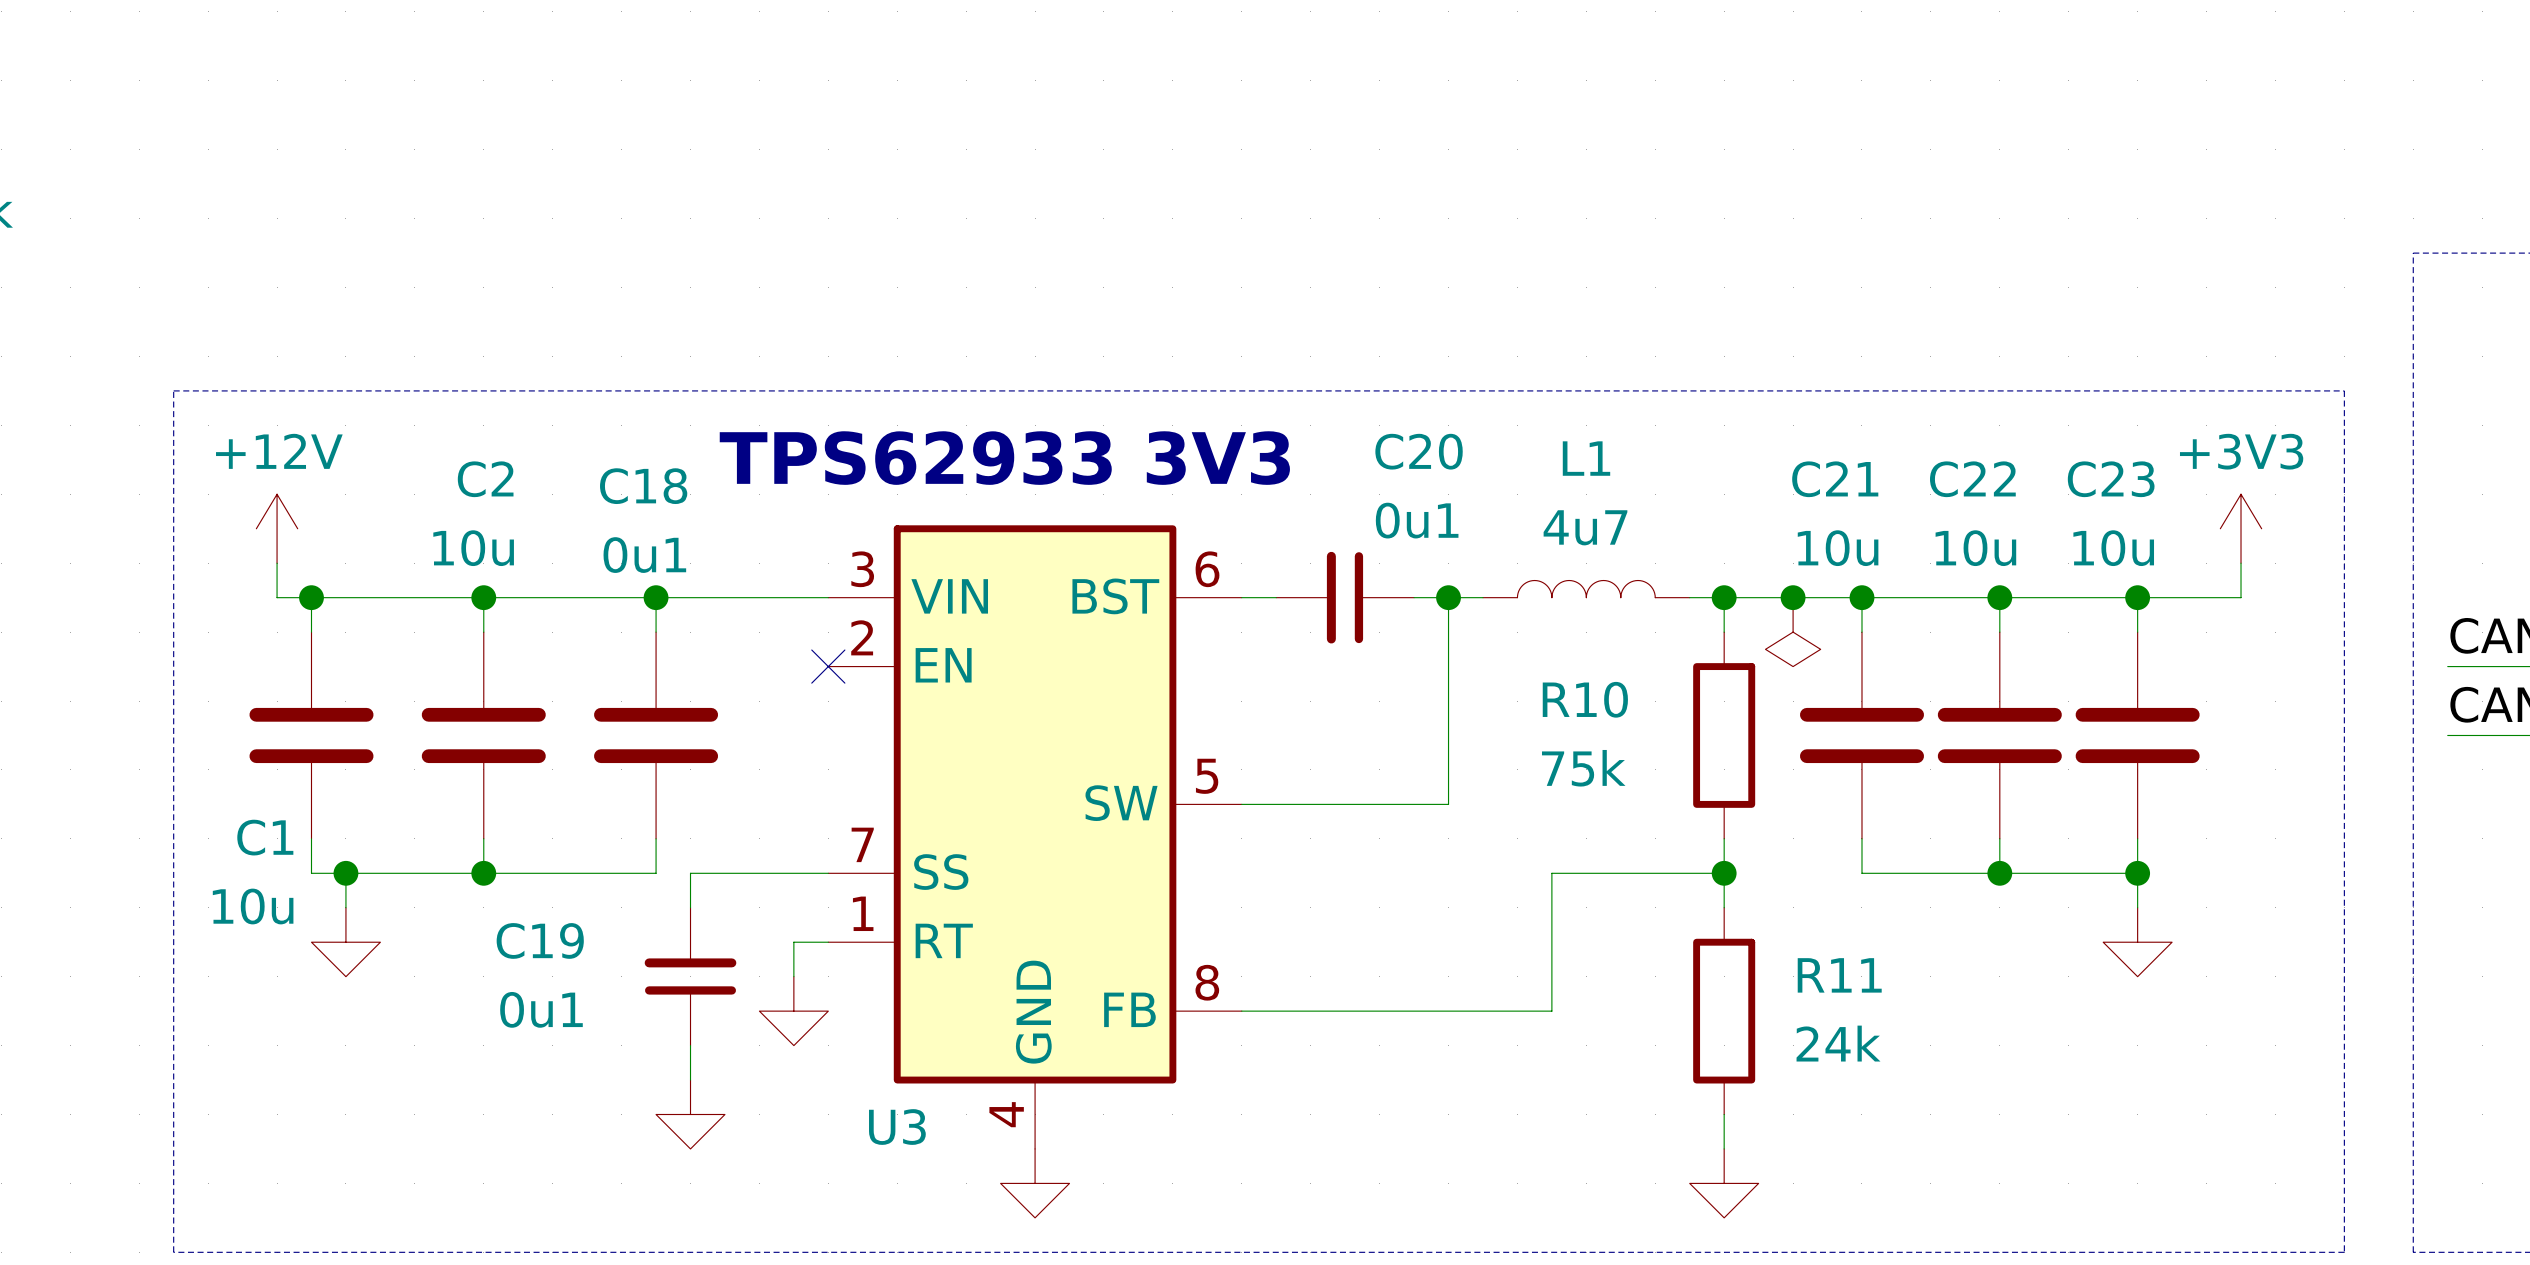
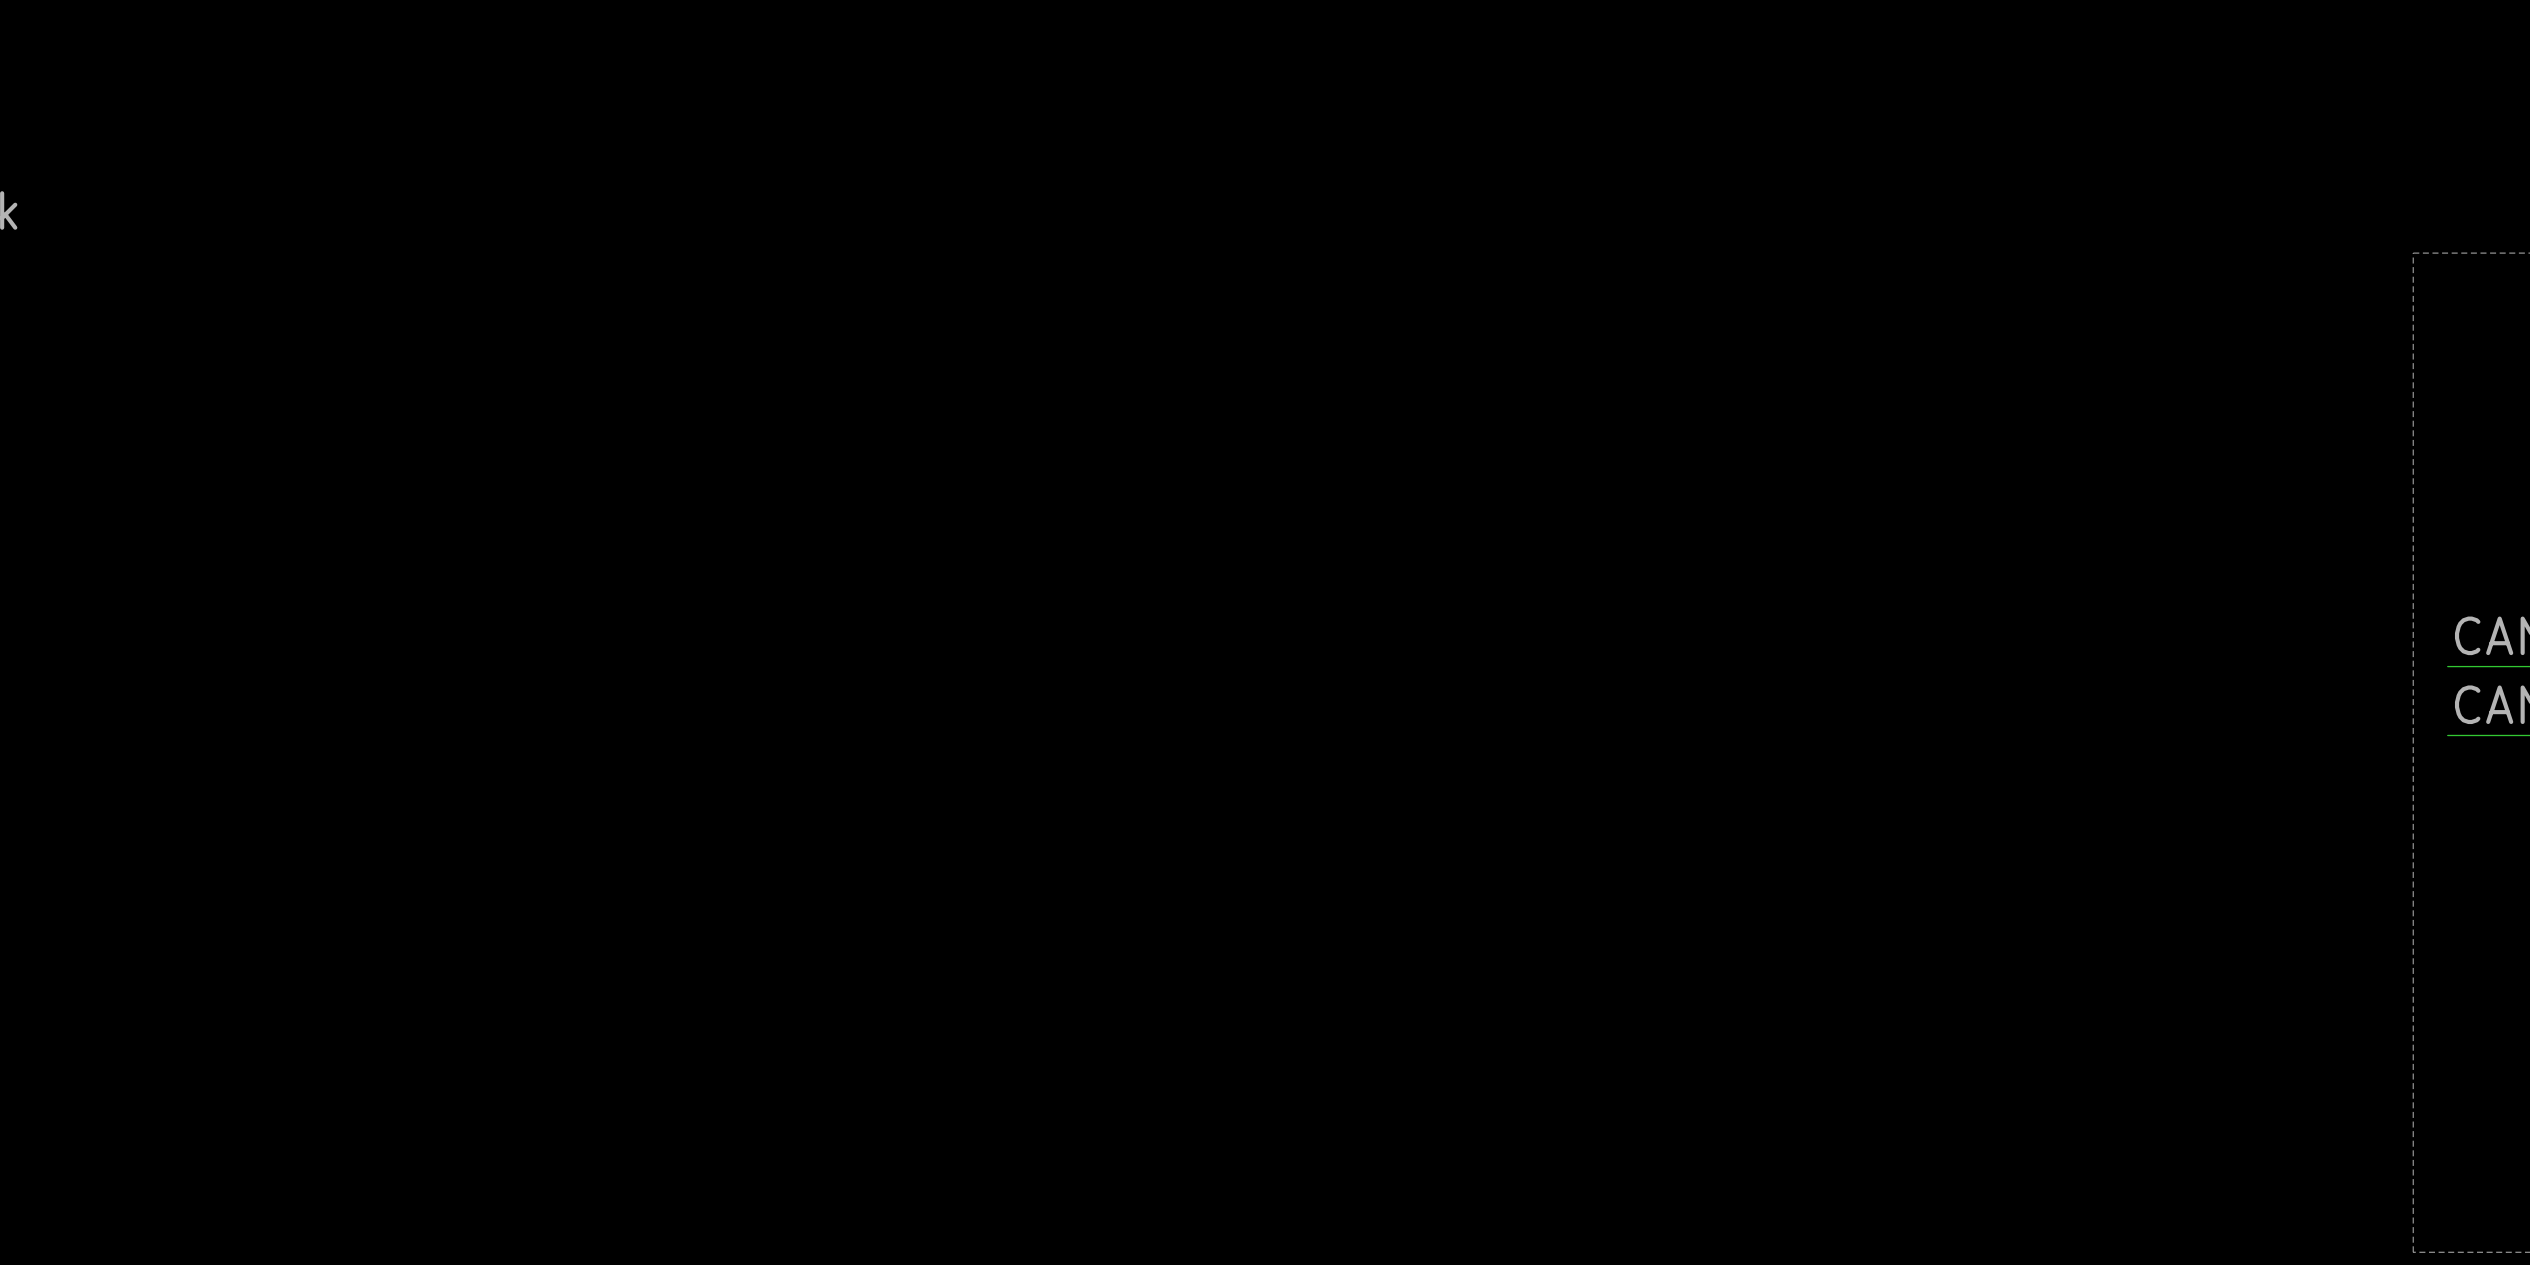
line: (173, 390) (2344, 390) (2344, 1252) (173, 1252) (173, 390) -> none
text: TPS62933 3V3 (1004, 458) -> none
power symbol: +12V (277, 528) -> none
power symbol: +3V3 (2241, 528) -> none
wire: (277, 563) (277, 597) (828, 597) -> none
wire: (2241, 563) (2241, 597) (1689, 597) -> none
L1: 4u7 (1586, 589) -> none
wire: (311, 597) (311, 632) -> none
junction: (311, 597) -> none
wire: (483, 597) (483, 632) -> none
junction: (483, 597) -> none
wire: (656, 597) (656, 632) -> none
junction: (656, 597) -> none
wire: (1241, 597) (1276, 597) -> none
C20: 0u1 (1345, 597) -> none
wire: (1414, 597) (1482, 597) -> none
wire: (1448, 597) (1448, 804) (1241, 804) -> none
junction: (1448, 597) -> none
wire: (1724, 597) (1724, 632) -> none
junction: (1724, 597) -> none
junction: (1793, 597) -> none
wire: (1861, 597) (1861, 632) -> none
junction: (1861, 597) -> none
wire: (1999, 597) (1999, 632) -> none
junction: (1999, 597) -> none
wire: (2137, 597) (2137, 632) -> none
junction: (2137, 597) -> none
power symbol: (1793, 632) -> none
no-connect mark: (828, 666) -> none
C1: 10u (311, 735) -> none
C2: 10u (483, 735) -> none
C18: 0u1 (656, 735) -> none
R10: 75k (1724, 735) -> none
C21: 10u (1861, 735) -> none
C22: 10u (1999, 735) -> none
C23: 10u (2137, 735) -> none
U3: (1035, 837) -> none
wire: (311, 838) (311, 873) (656, 873) (656, 838) -> none
wire: (483, 838) (483, 873) -> none
wire: (1724, 838) (1724, 907) -> none
wire: (1861, 838) (1861, 873) (2137, 873) -> none
wire: (1999, 838) (1999, 873) -> none
wire: (2137, 838) (2137, 907) -> none
wire: (345, 873) (345, 907) -> none
junction: (345, 873) -> none
junction: (483, 873) -> none
wire: (828, 873) (690, 873) (690, 907) -> none
wire: (1724, 873) (1551, 873) (1551, 1011) (1241, 1011) -> none
junction: (1724, 873) -> none
junction: (1999, 873) -> none
junction: (2137, 873) -> none
power symbol: (345, 942) -> none
wire: (828, 942) (793, 942) (793, 976) -> none
power symbol: (2137, 942) -> none
C19: 0u1 (690, 976) -> none
power symbol: (793, 1011) -> none
R11: 24k (1724, 1011) -> none
wire: (690, 1045) (690, 1080) -> none
power symbol: (690, 1114) -> none
wire: (1724, 1114) (1724, 1148) -> none
power symbol: (1035, 1183) -> none
power symbol: (1724, 1183) -> none

